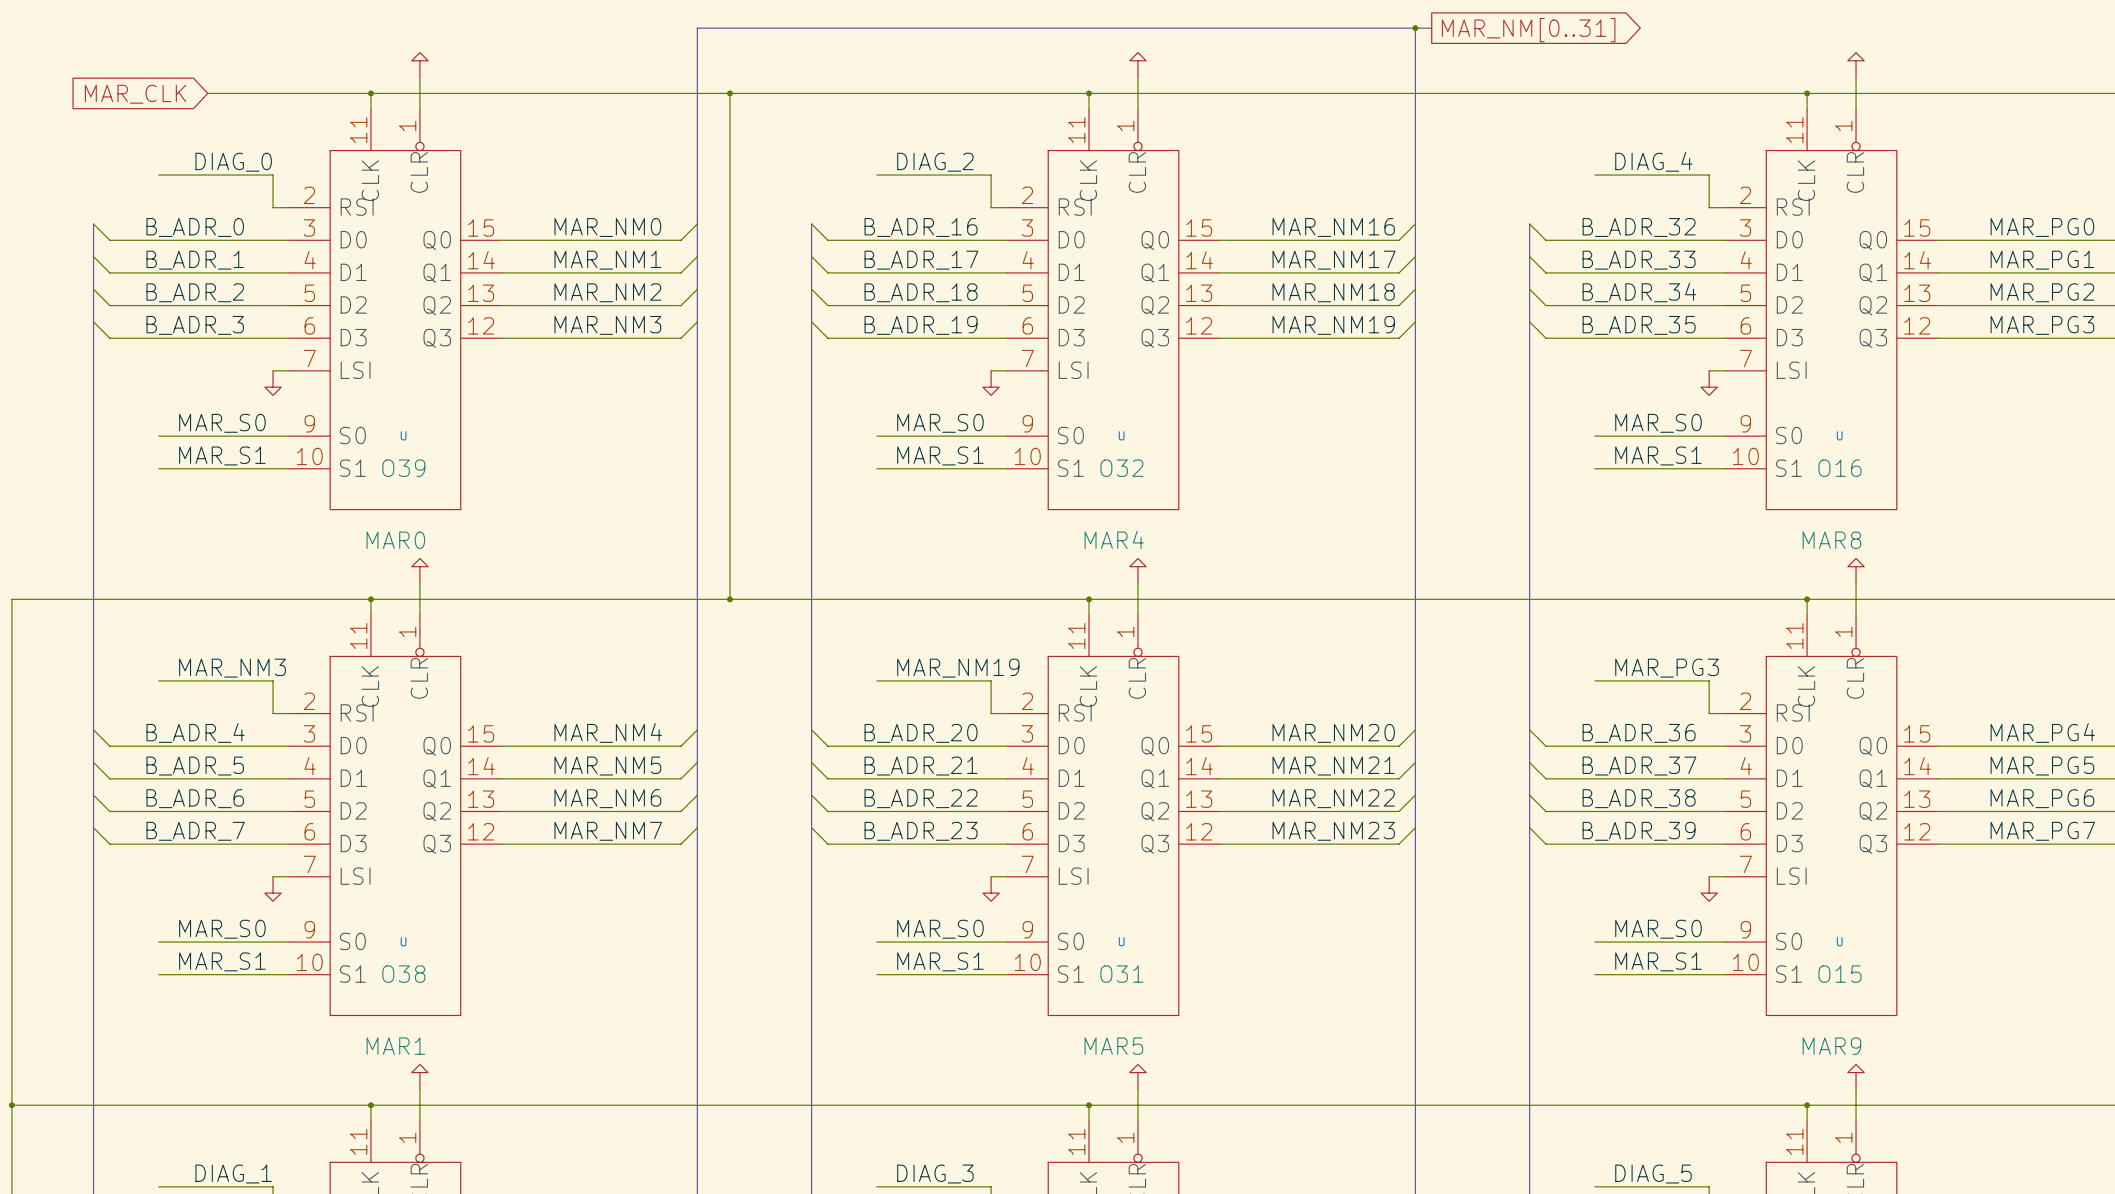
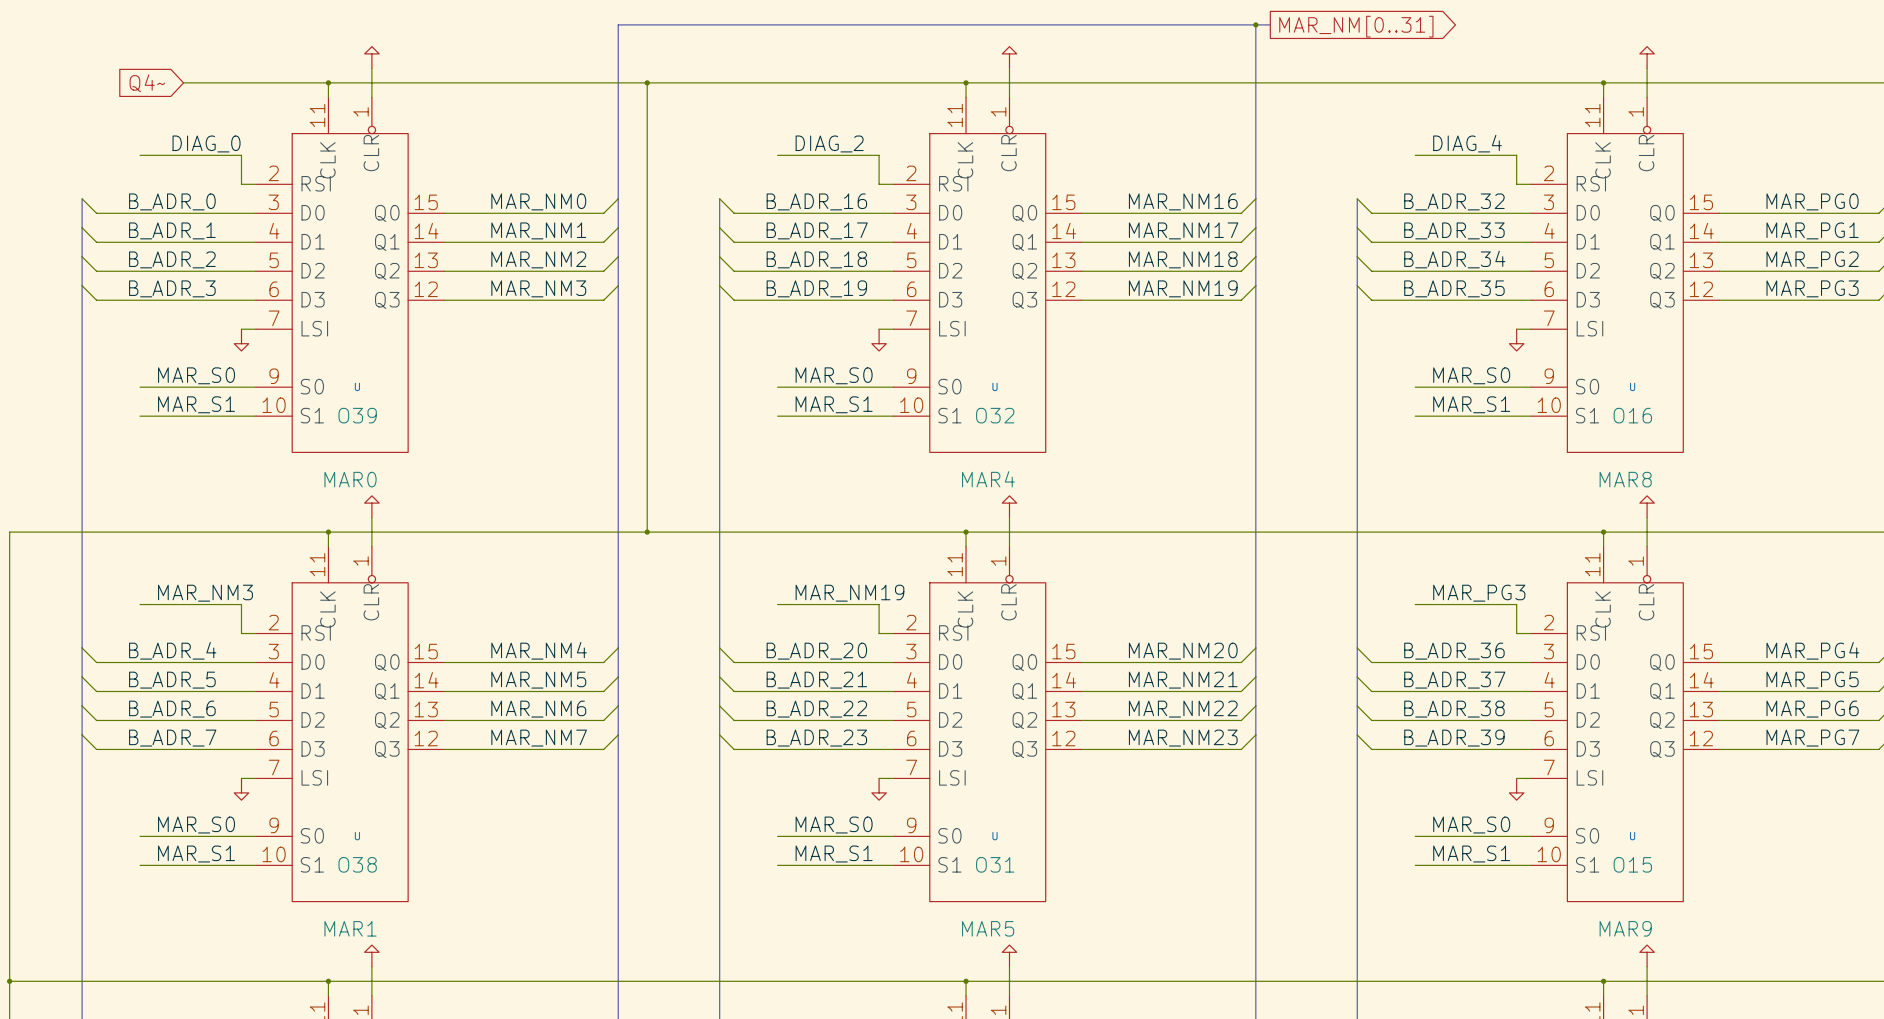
global label: MAR_CLK (135, 94) -> Q4~ (147, 83)

